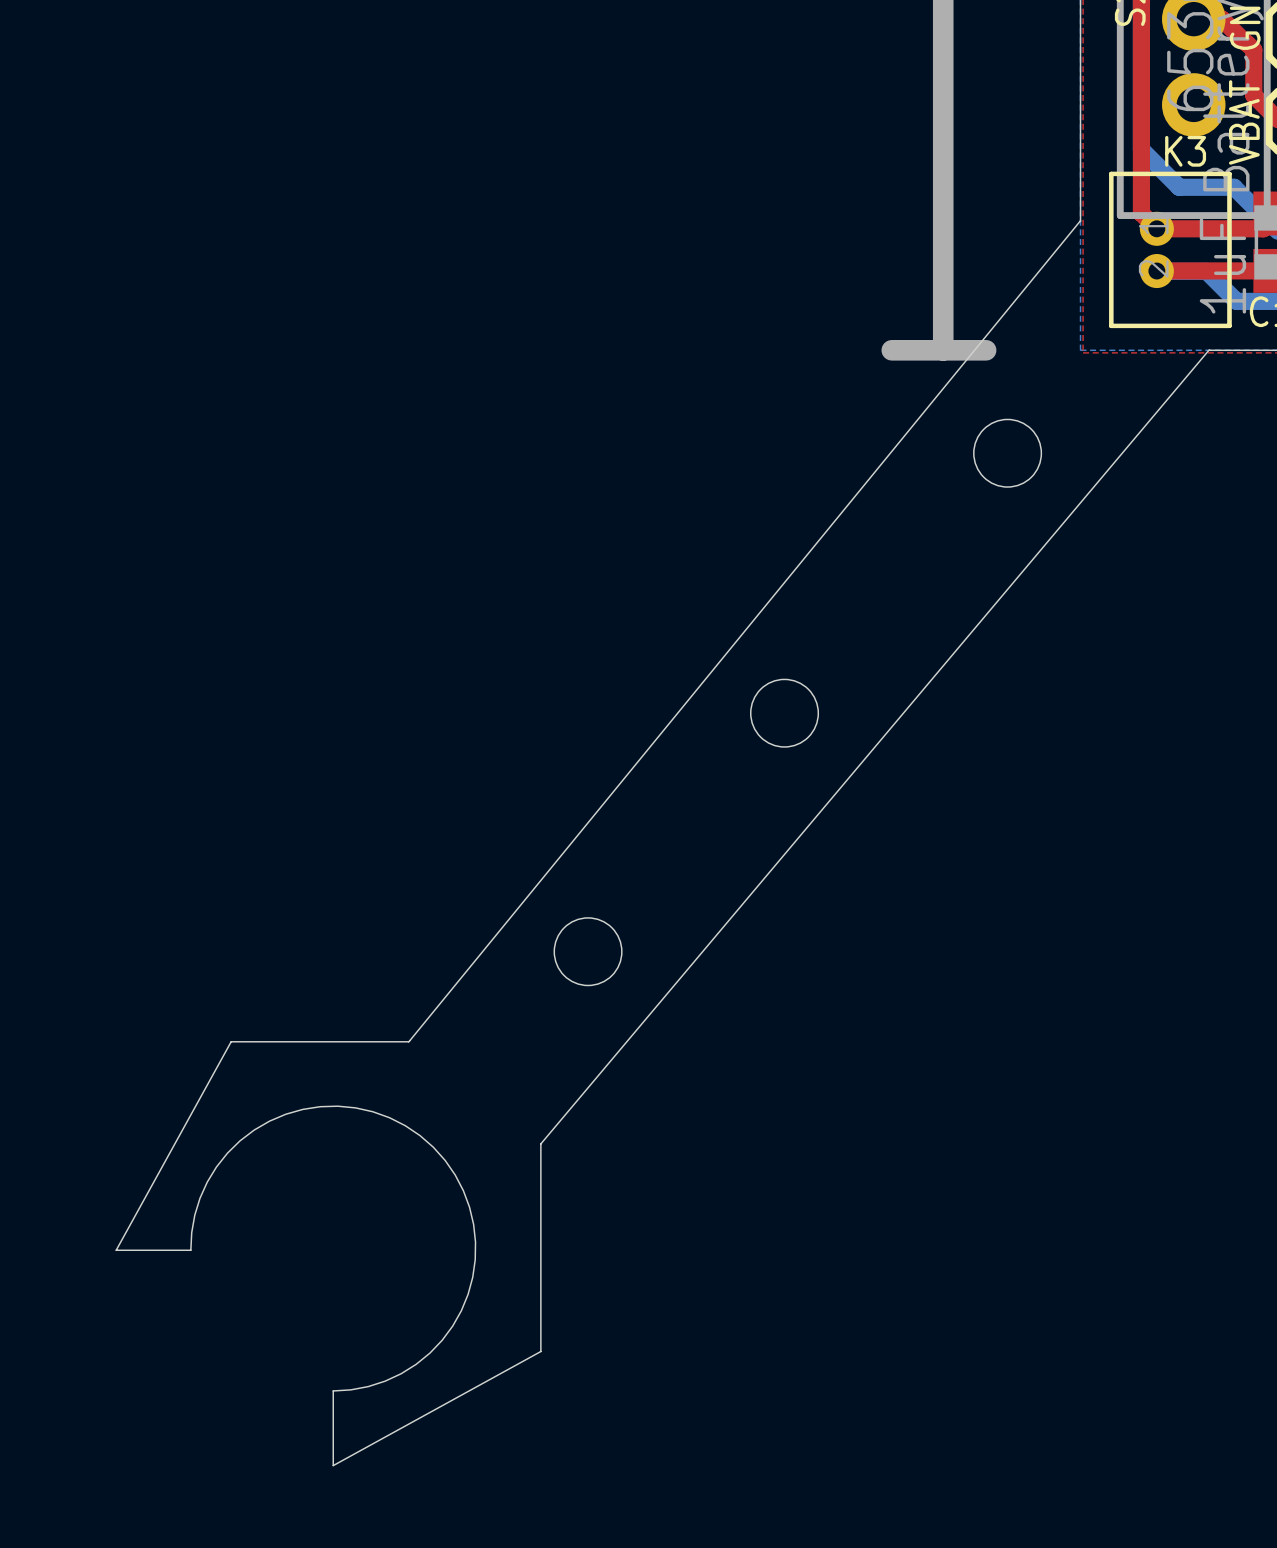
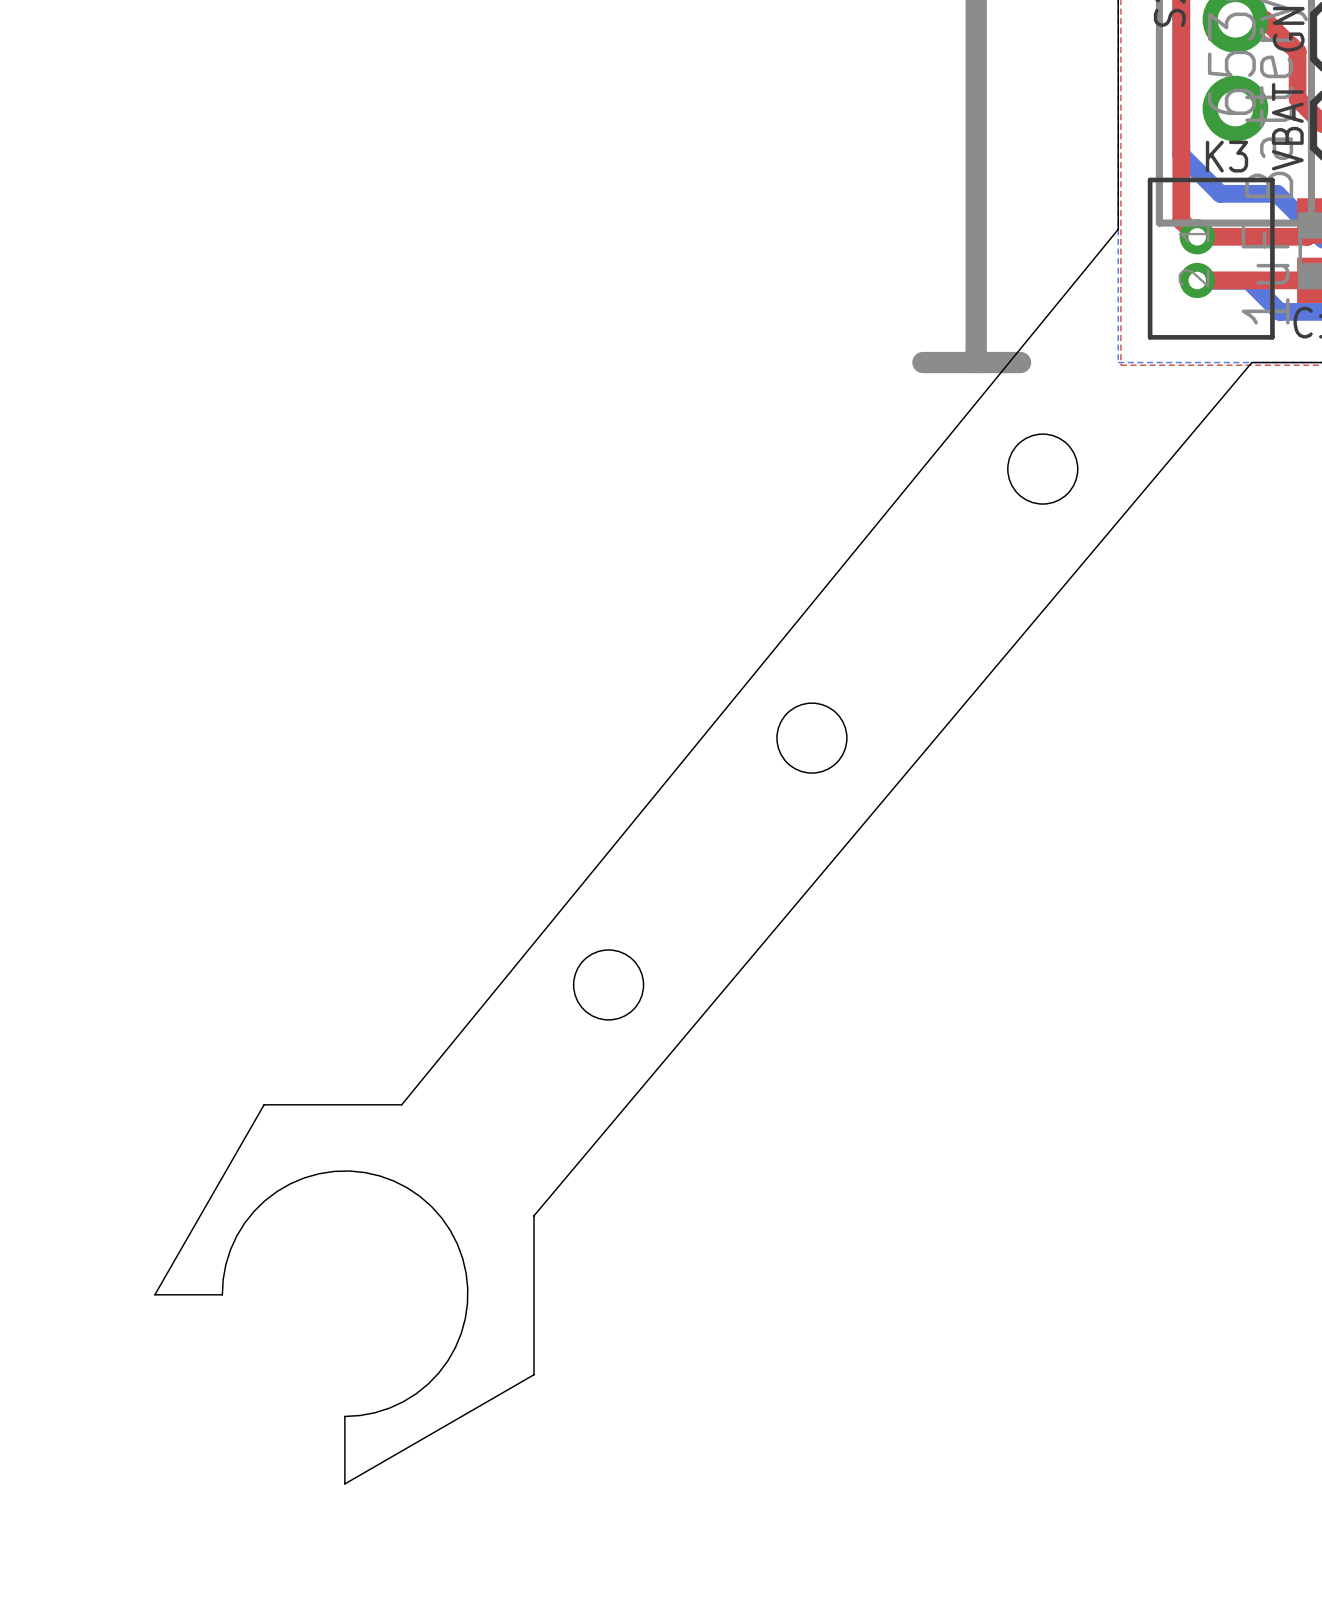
board edge: (1080, 220) (408, 1041) (231, 1041) (116, 1250) (190, 1250) (194, 1215) (200, 1198) (207, 1182) (227, 1153) (254, 1130) (269, 1121) (285, 1114) (320, 1106) (338, 1106) (372, 1111) (405, 1125) (420, 1135) (445, 1160) (455, 1174) (469, 1207) (475, 1242) (472, 1277) (461, 1310) (442, 1340) (416, 1364) (401, 1373) (368, 1386) (333, 1390) -> (1118, 229) (401, 1104) (264, 1104) (154, 1294) (222, 1294) (223, 1279) (230, 1250) (244, 1223) (254, 1211) (277, 1191) (290, 1183) (304, 1177) (334, 1171) (364, 1172) (379, 1175) (407, 1187) (431, 1206) (441, 1217) (457, 1244) (462, 1258) (467, 1288) (465, 1318) (455, 1347) (447, 1360) (428, 1384) (403, 1401) (375, 1412) (344, 1416) (344, 1439)
board edge: (1209, 349) (540, 1143) (540, 1351) (333, 1465) (333, 1433) -> (1251, 362) (534, 1215) (534, 1374) (344, 1483)

